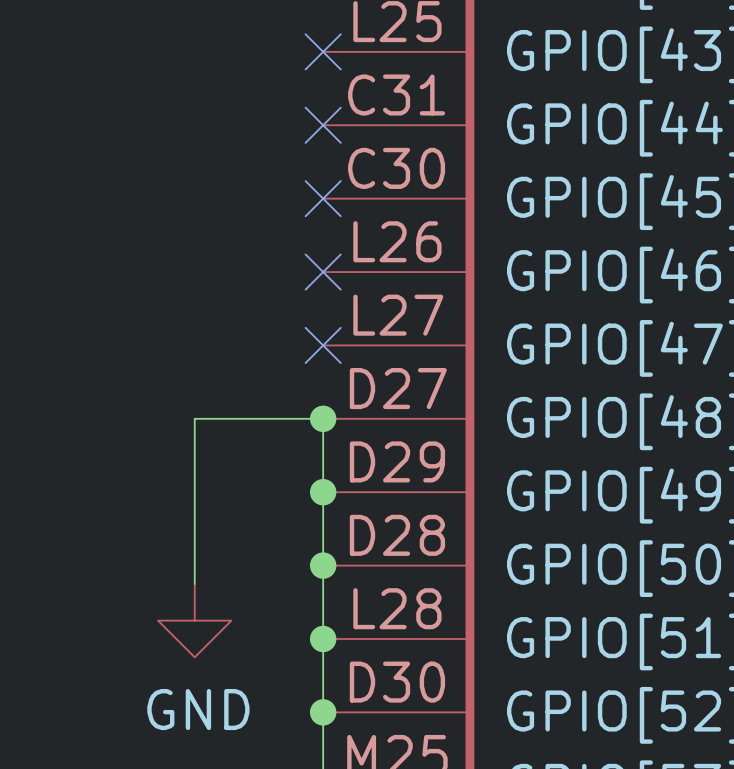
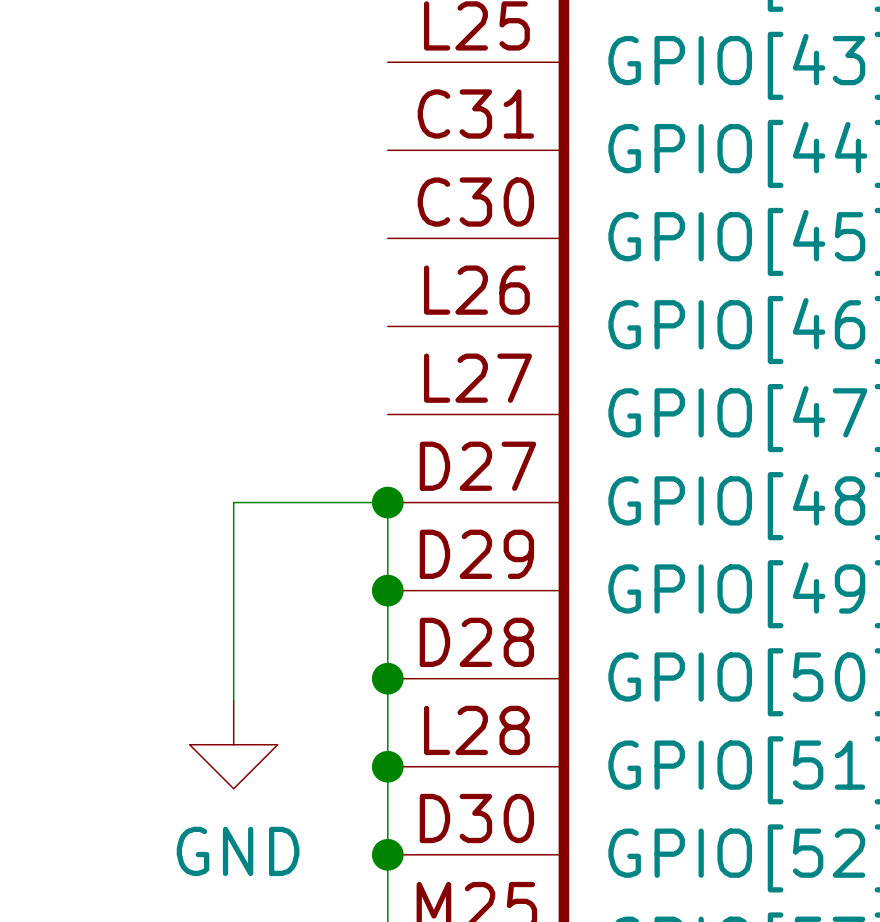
no-connect mark: (323, 51) -> none
no-connect mark: (323, 125) -> none
no-connect mark: (323, 198) -> none
no-connect mark: (323, 272) -> none
no-connect mark: (323, 345) -> none

